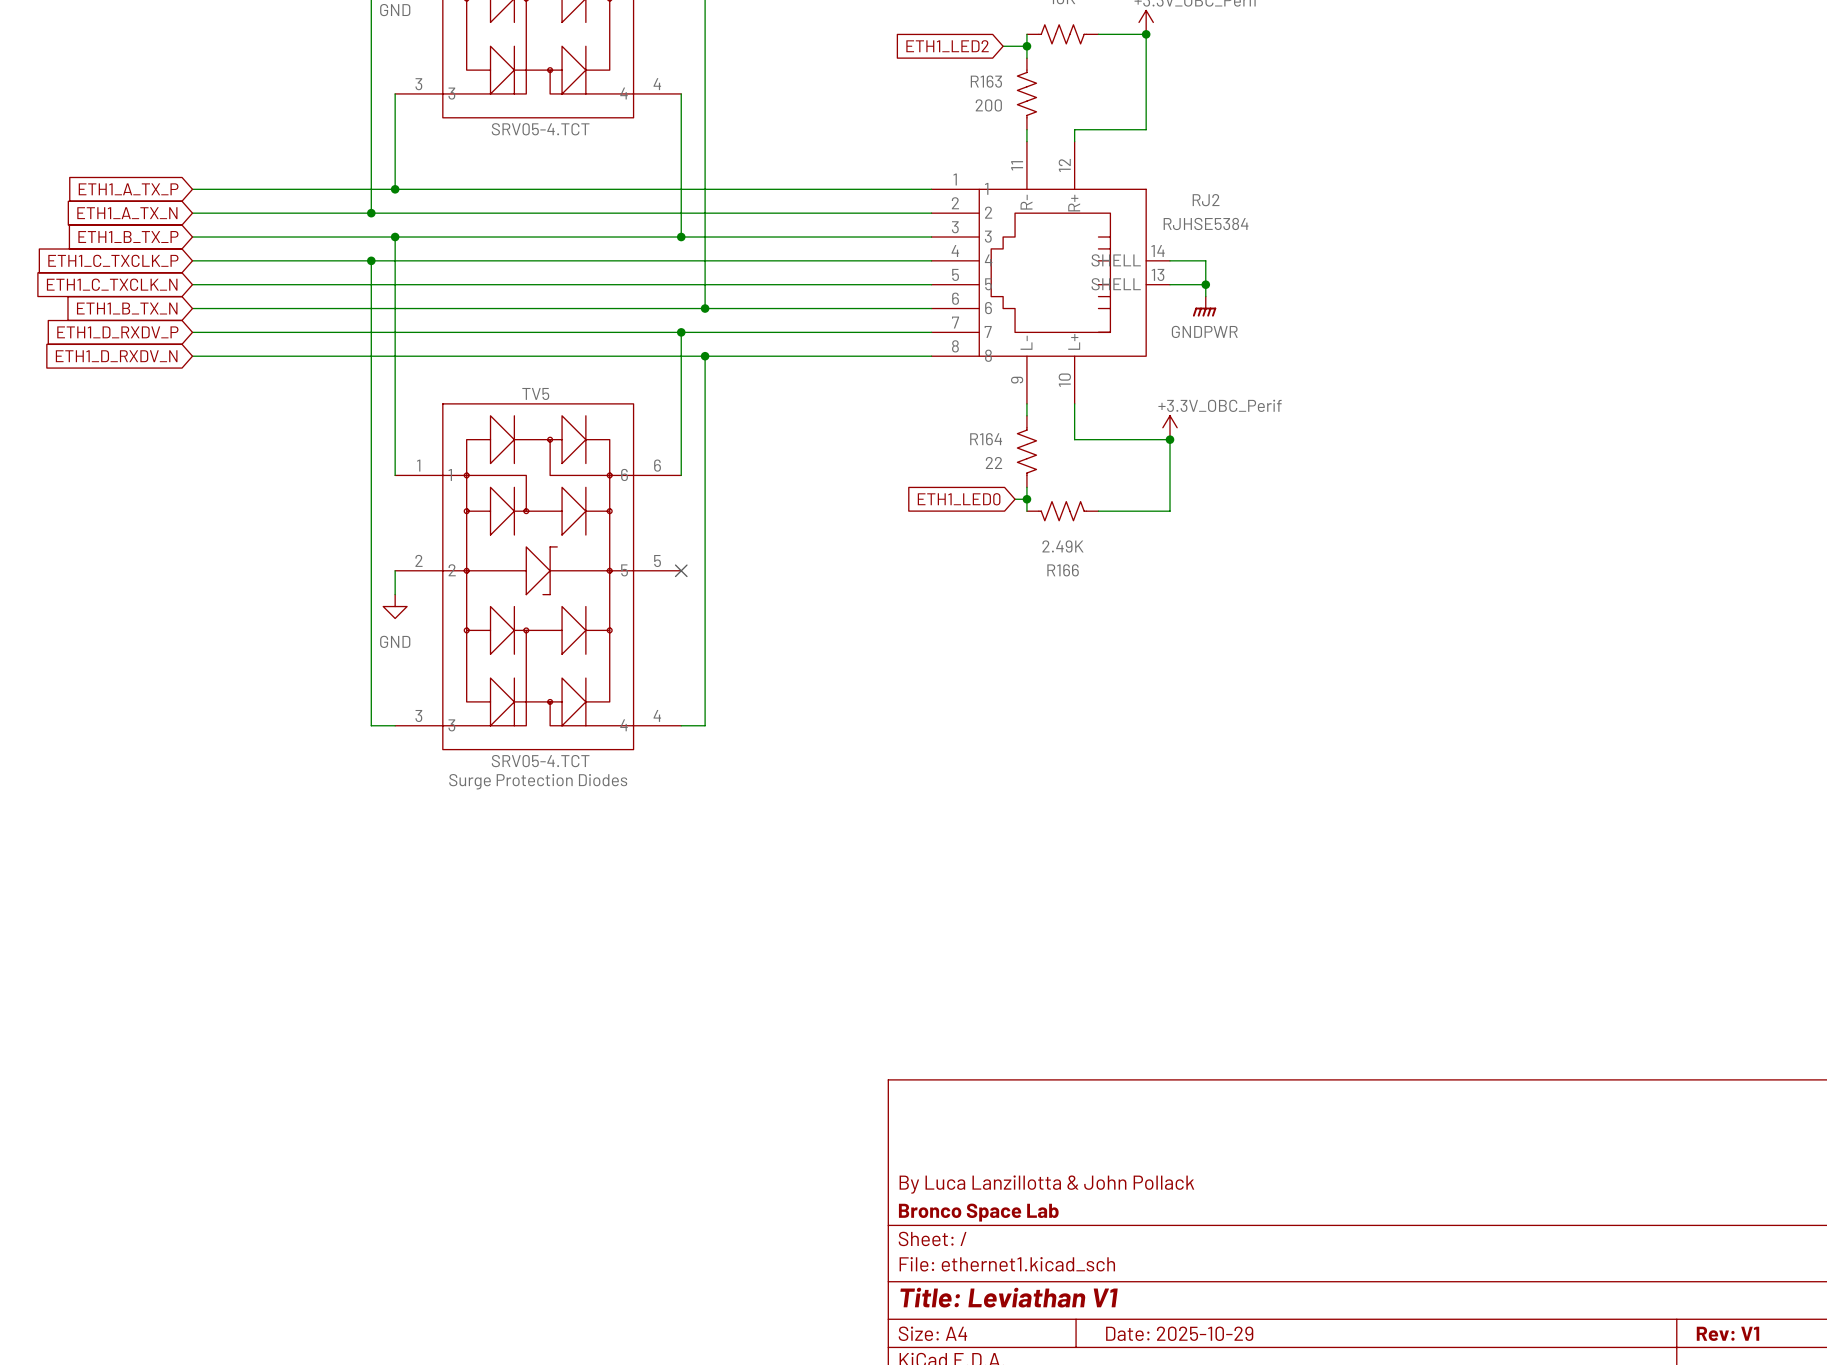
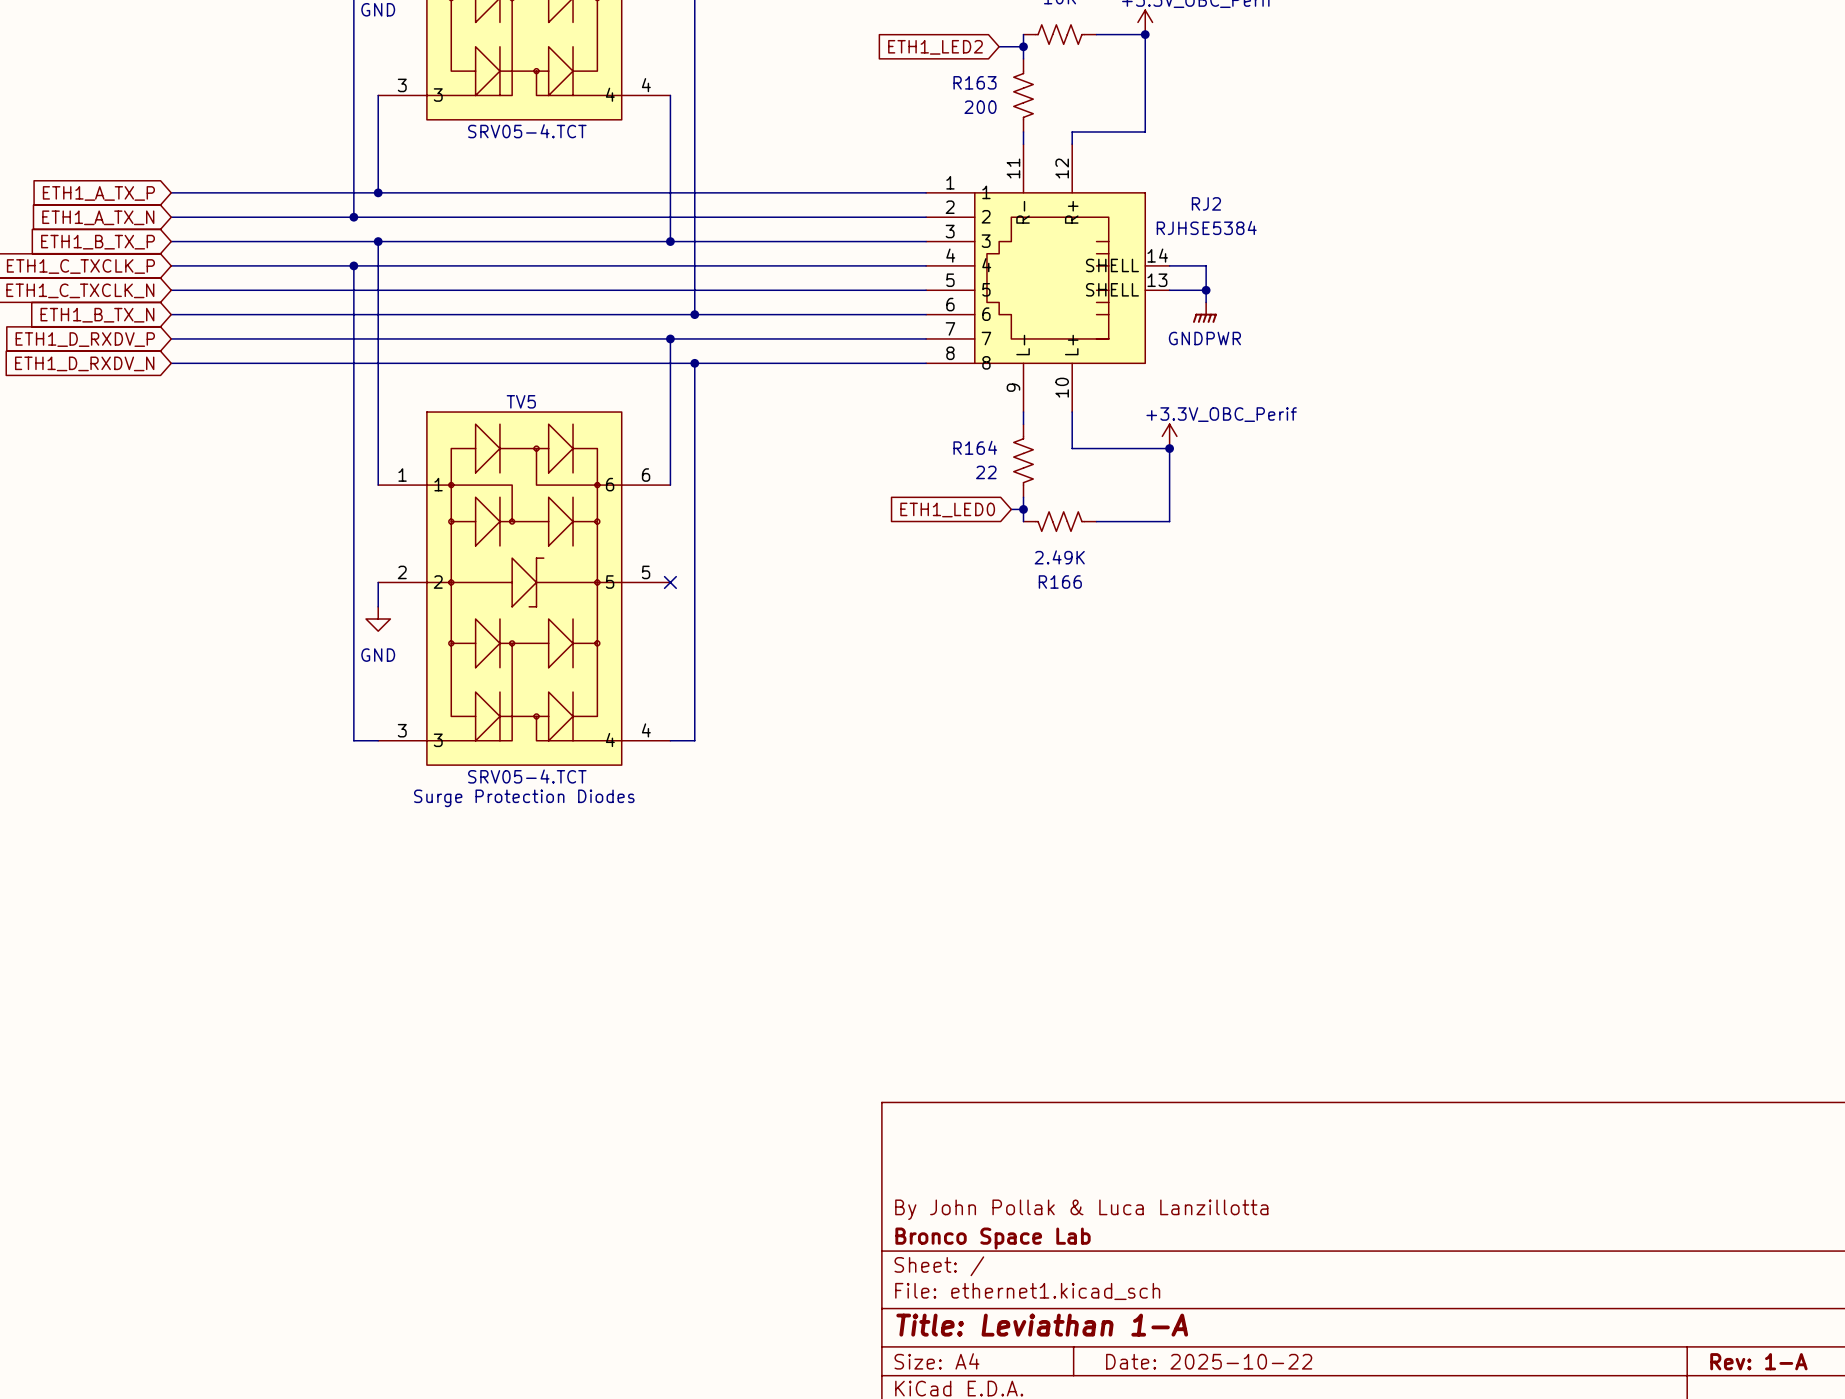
title block: By Luca Lanzillotta & John Pollack (1046, 1184) -> By John Pollak & Luca Lanzillotta (1081, 1209)
title block: Title: Leviathan V1 (1009, 1297) -> Title: Leviathan 1-A (1042, 1325)
title block: Date: 2025-10-29 (1179, 1333) -> Date: 2025-10-22 (1209, 1361)
title block: Rev: V1 (1727, 1333) -> Rev: 1-A (1758, 1361)

